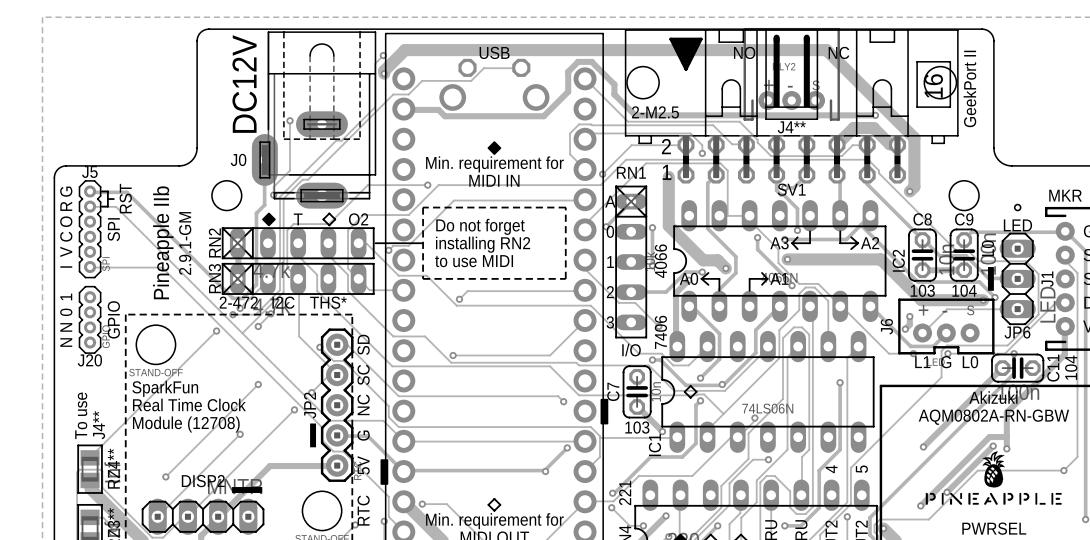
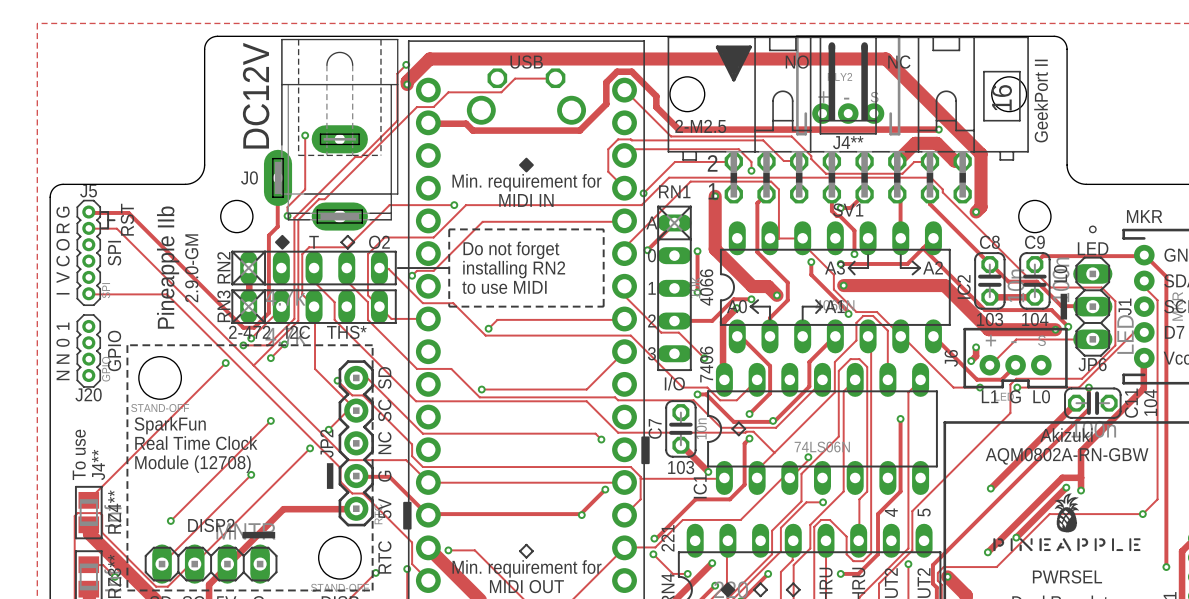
text: 2.9.1-GM (185, 243) -> 2.9.0-GM (191, 268)

